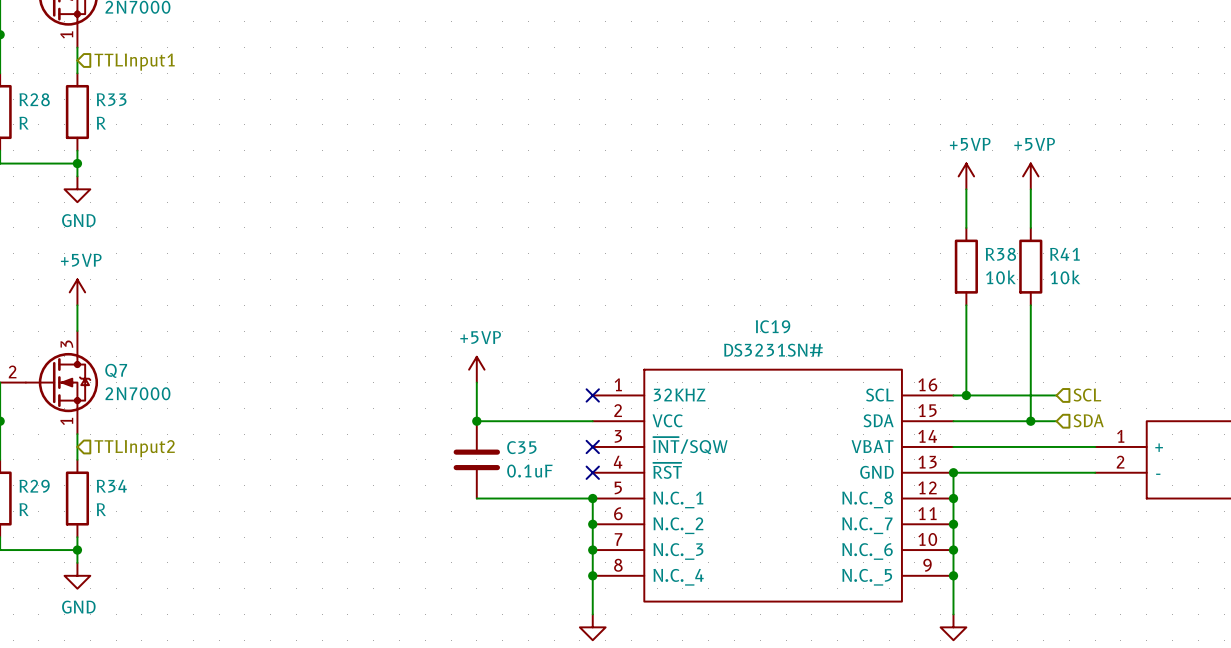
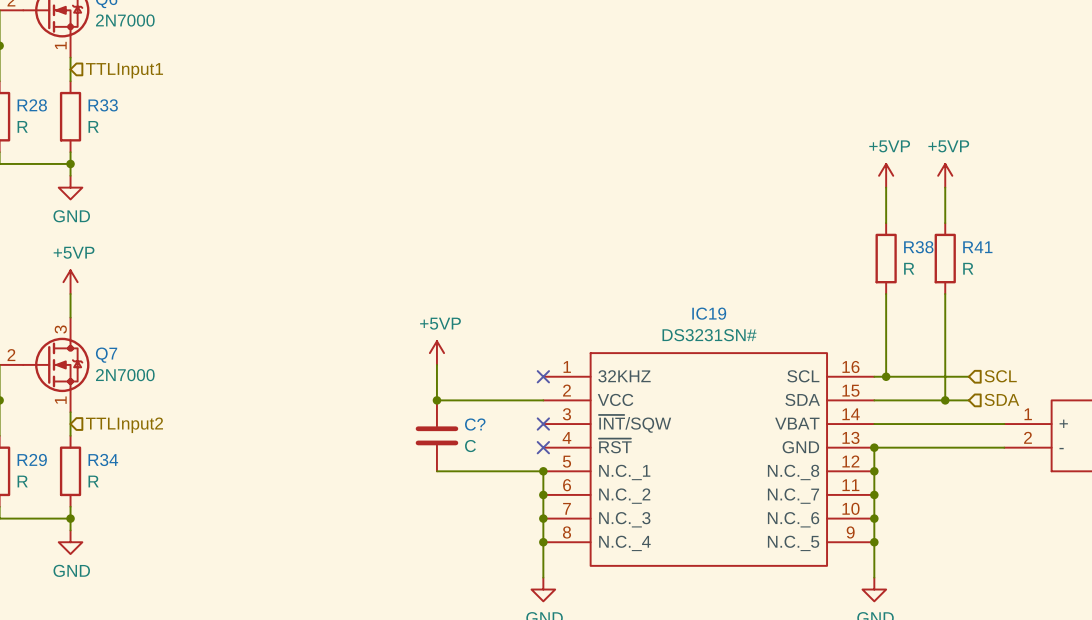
R38 value: 10k (1000, 277) -> R (909, 268)
R41 value: 10k (1065, 277) -> R (968, 268)
C35 name: C35 (521, 447) -> C? (475, 424)
C35 value: 0.1uF (529, 471) -> C (470, 446)

